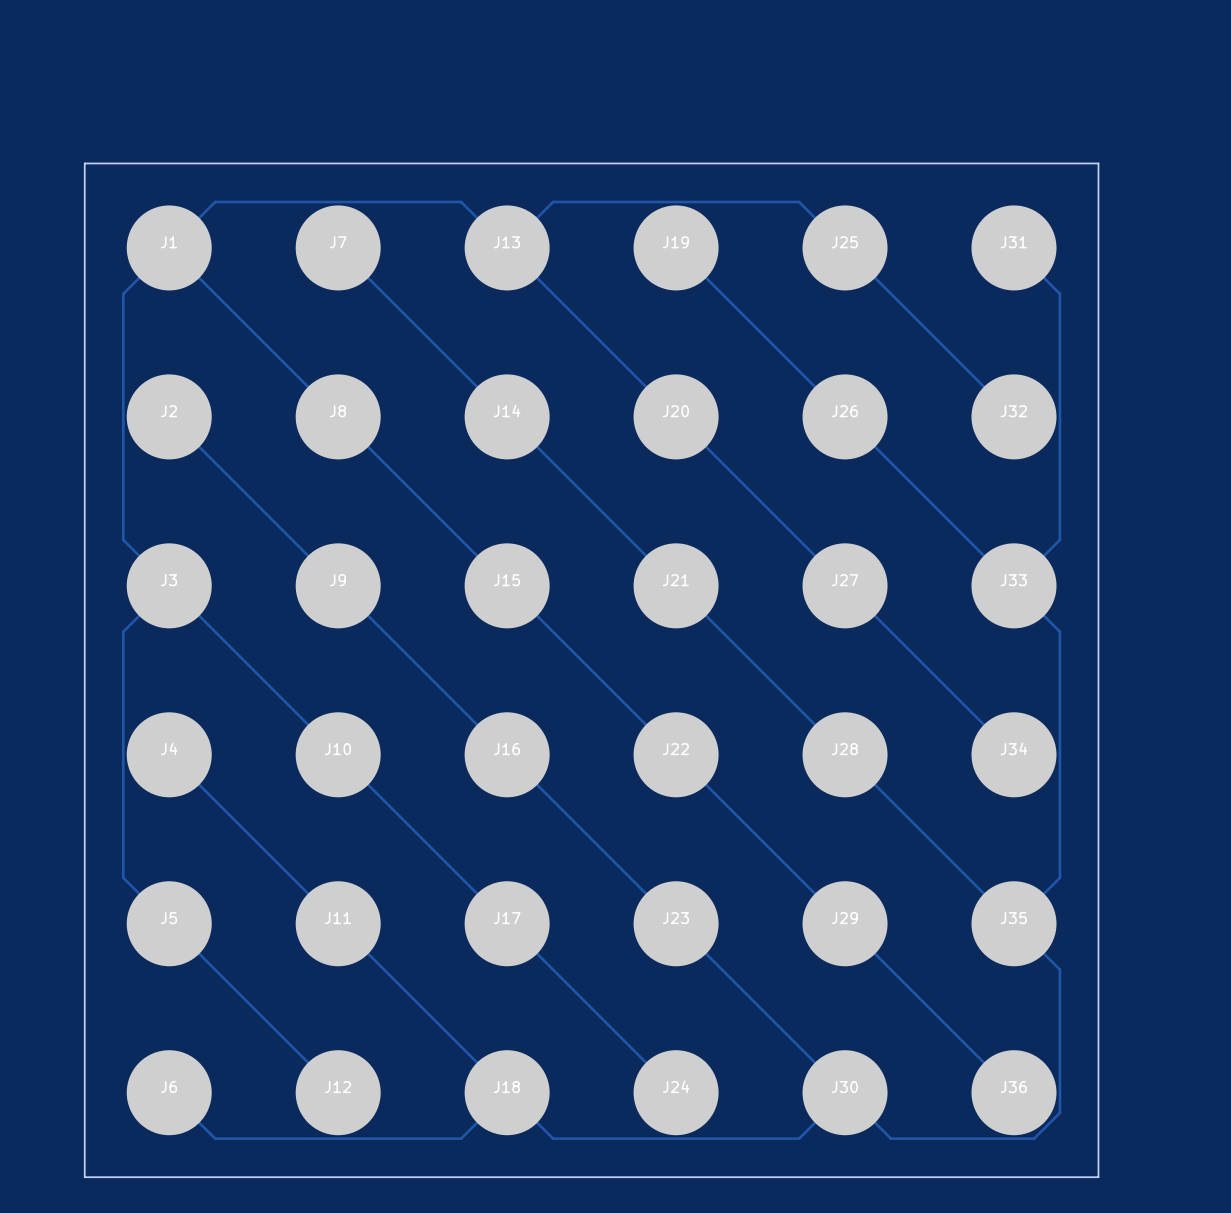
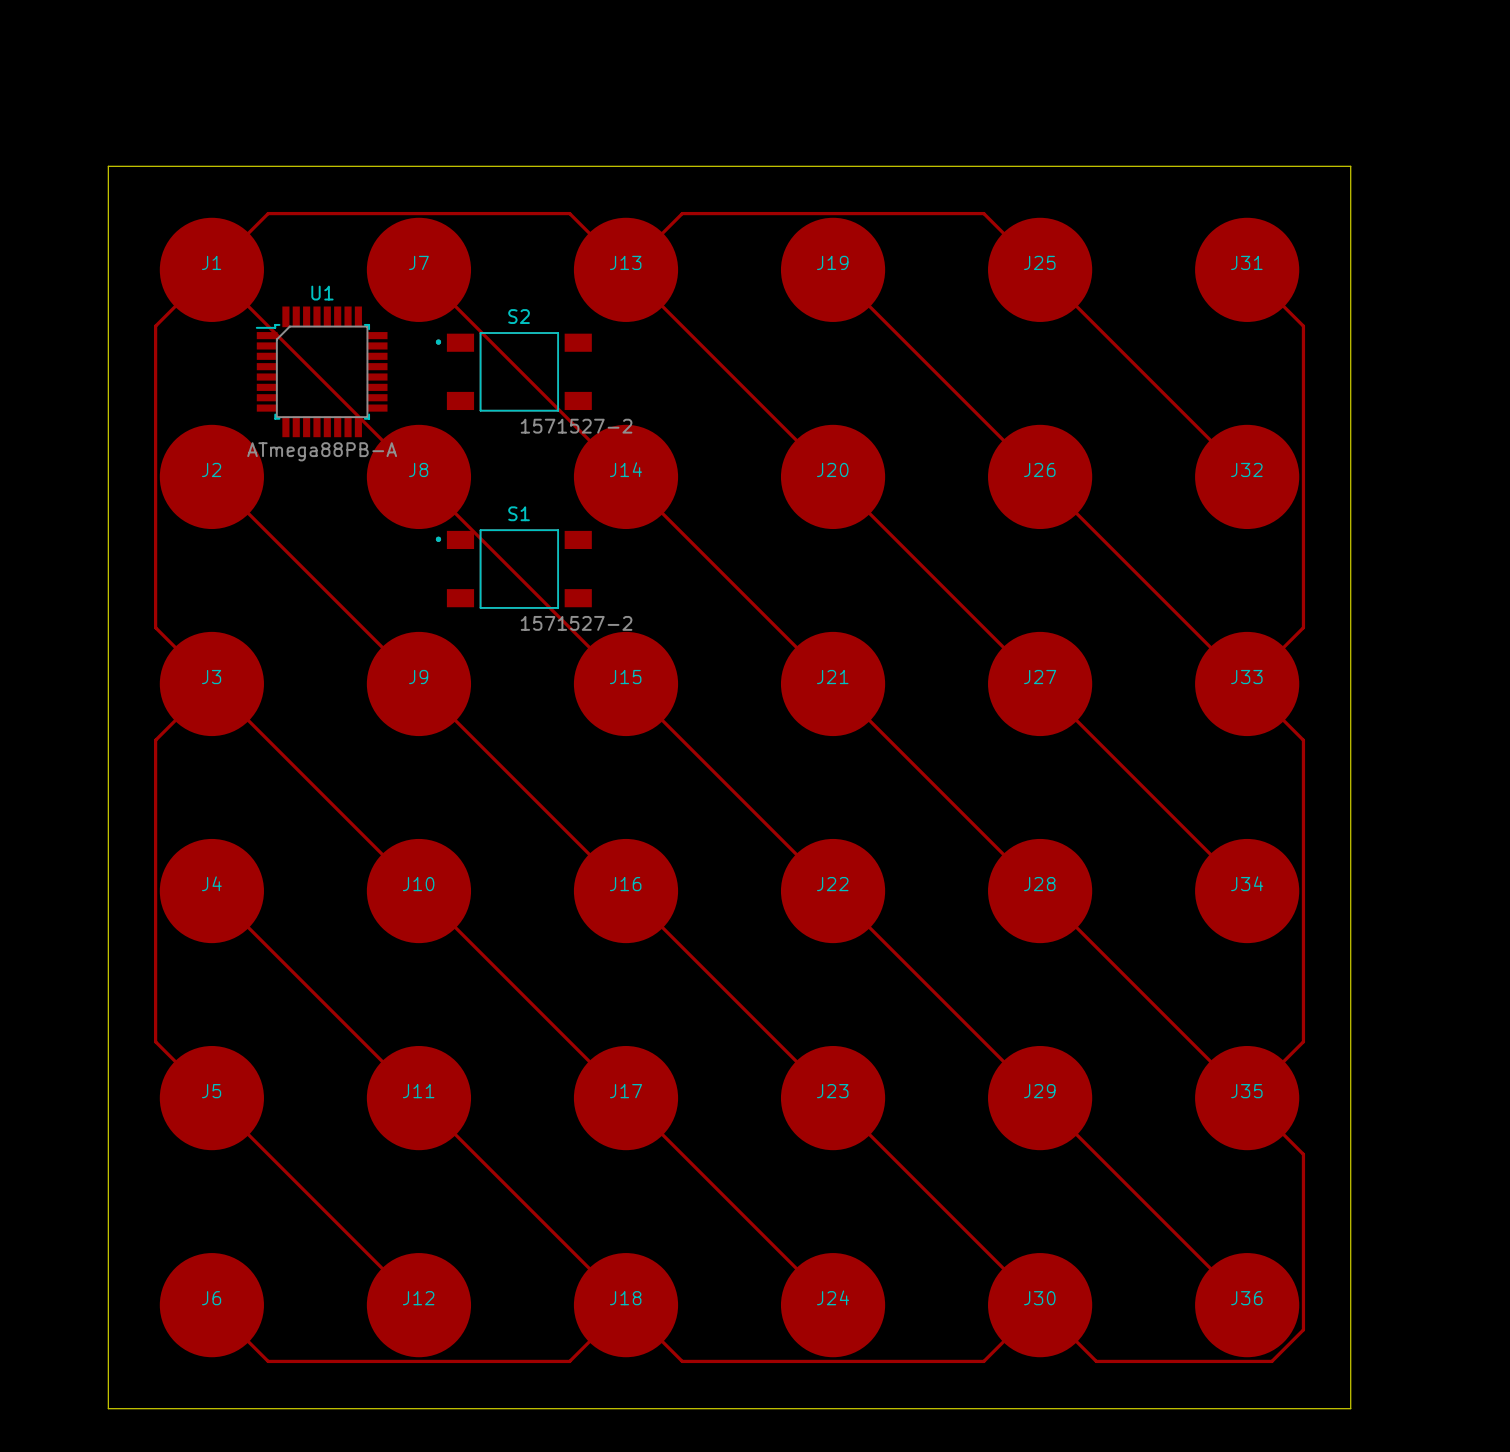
U1: none -> ATmega88PB-A (321, 371)
S2: none -> 1571527-2 (513, 371)
S1: none -> 1571527-2 (513, 569)

